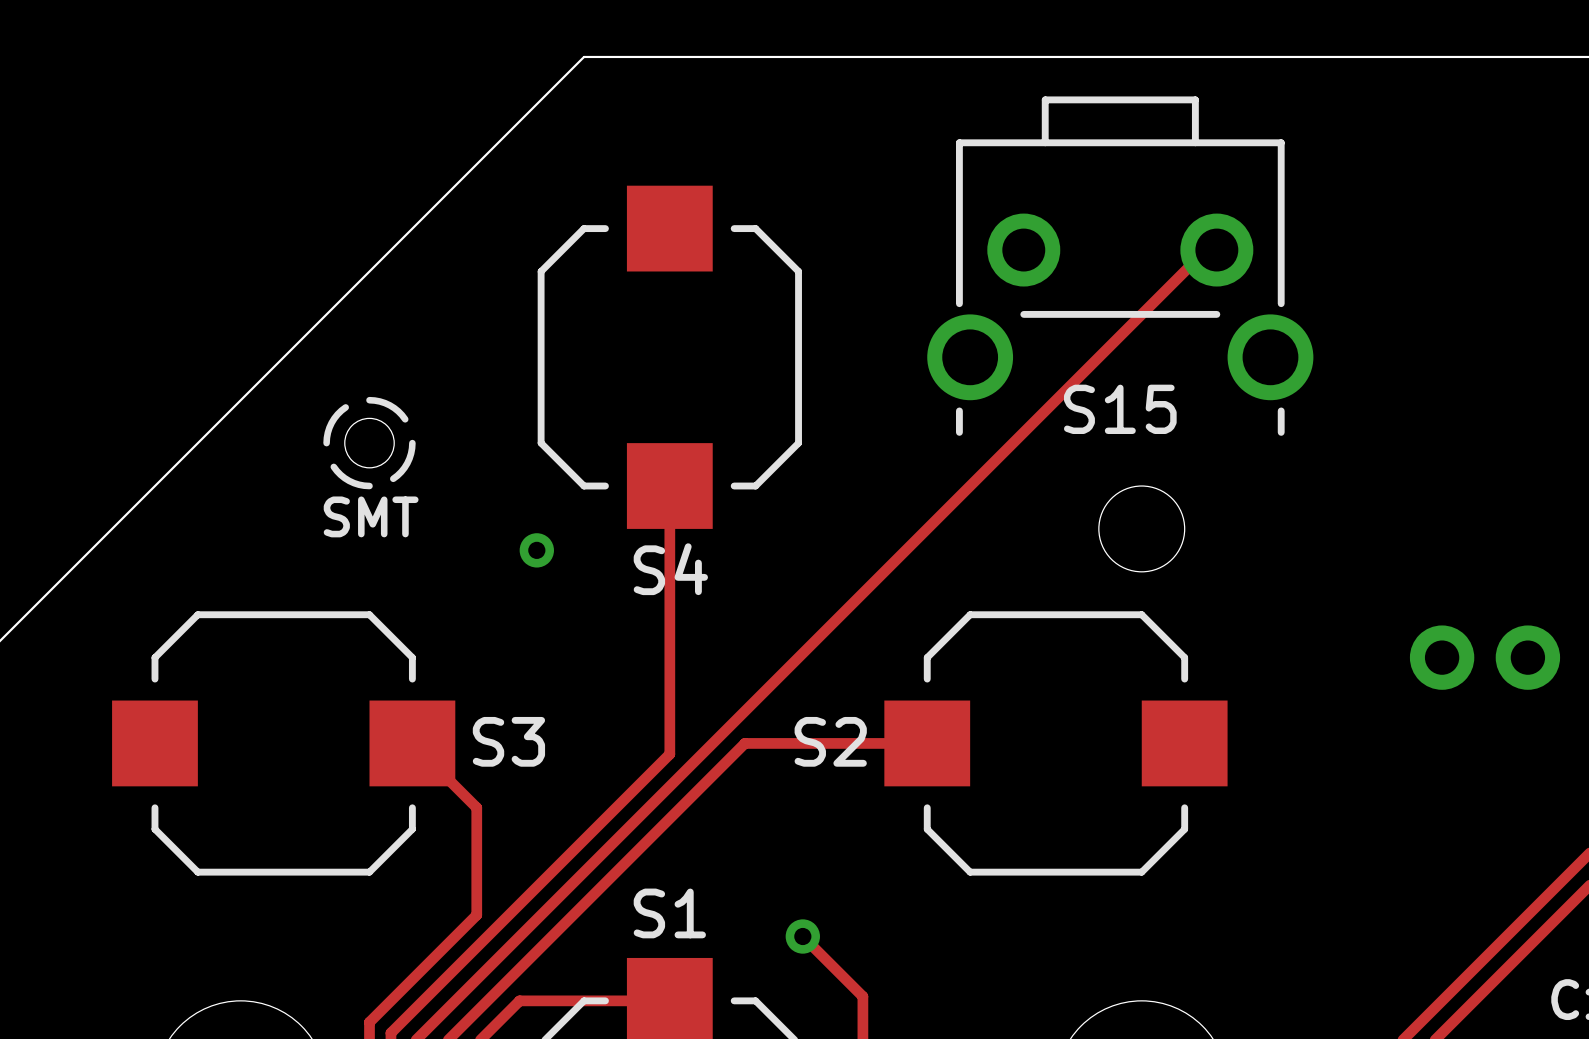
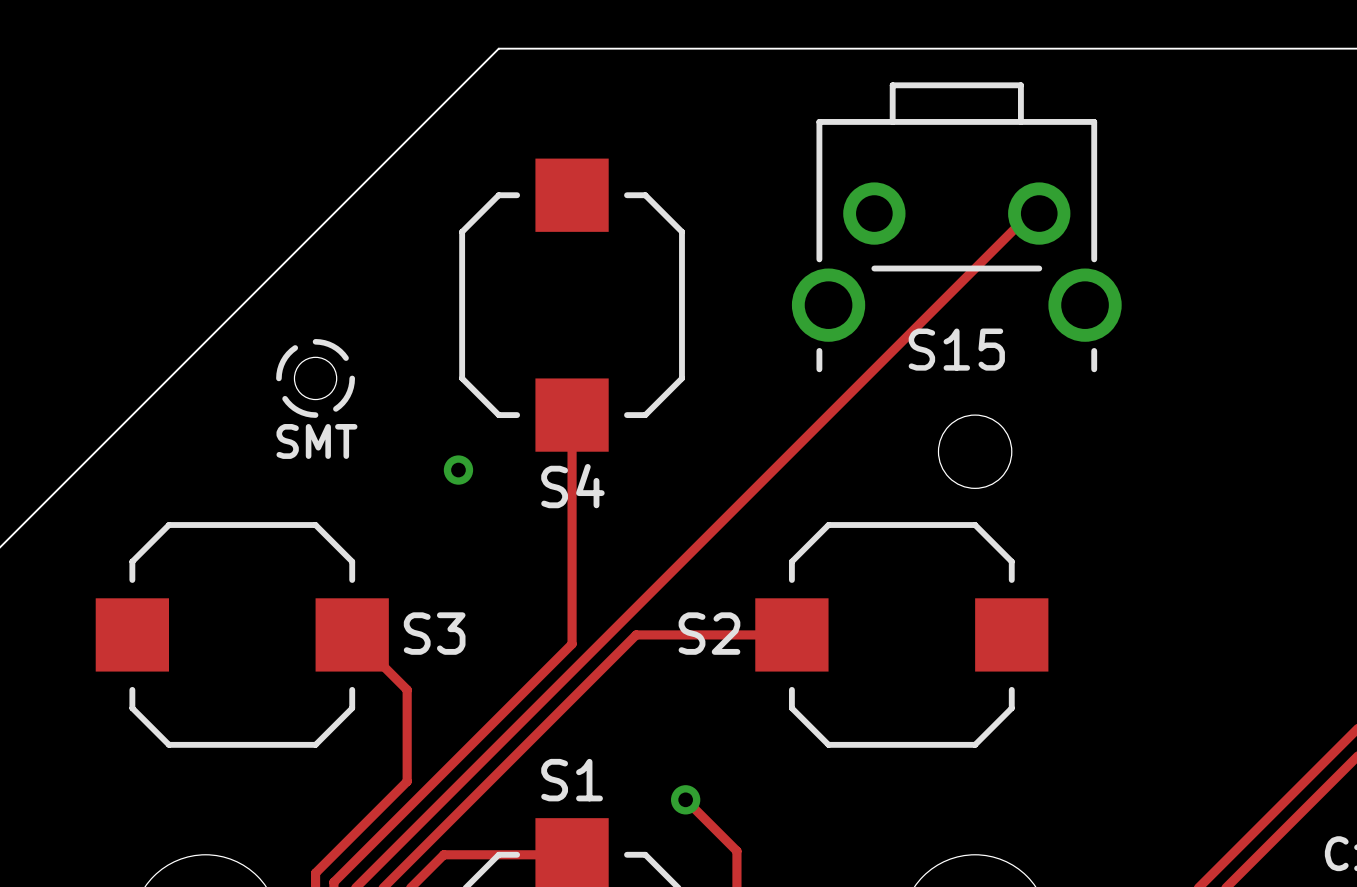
part: (1485, 657) -> none

